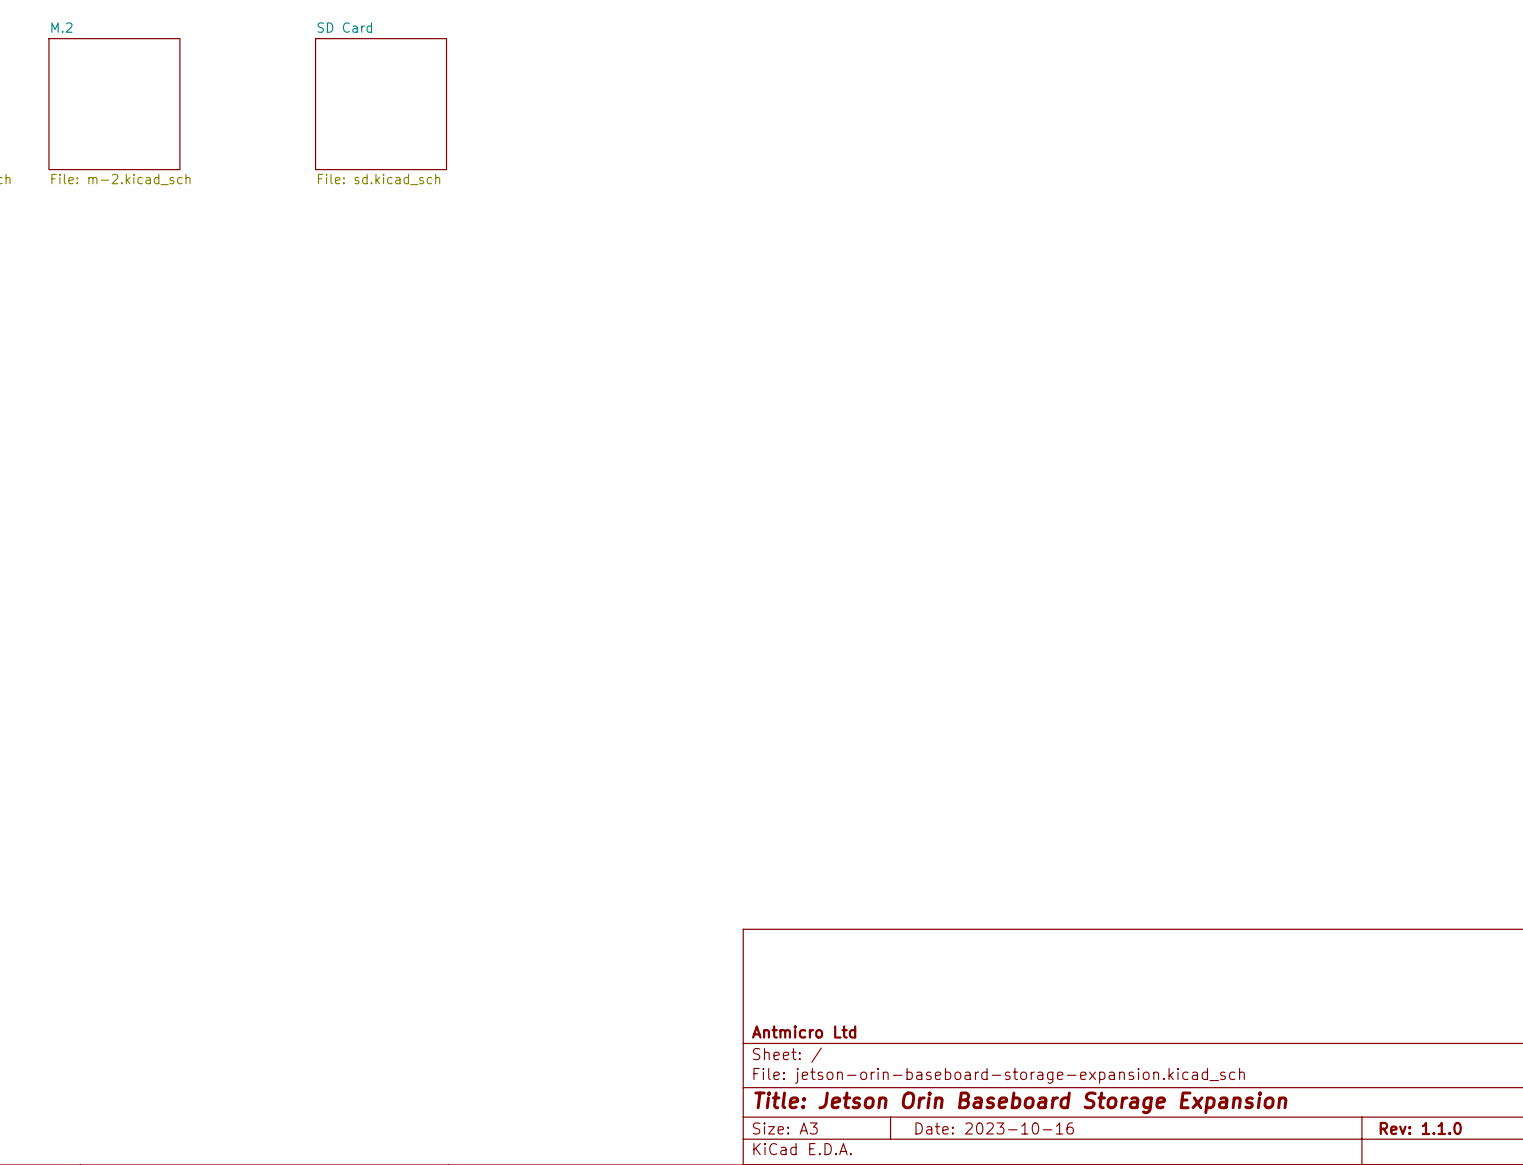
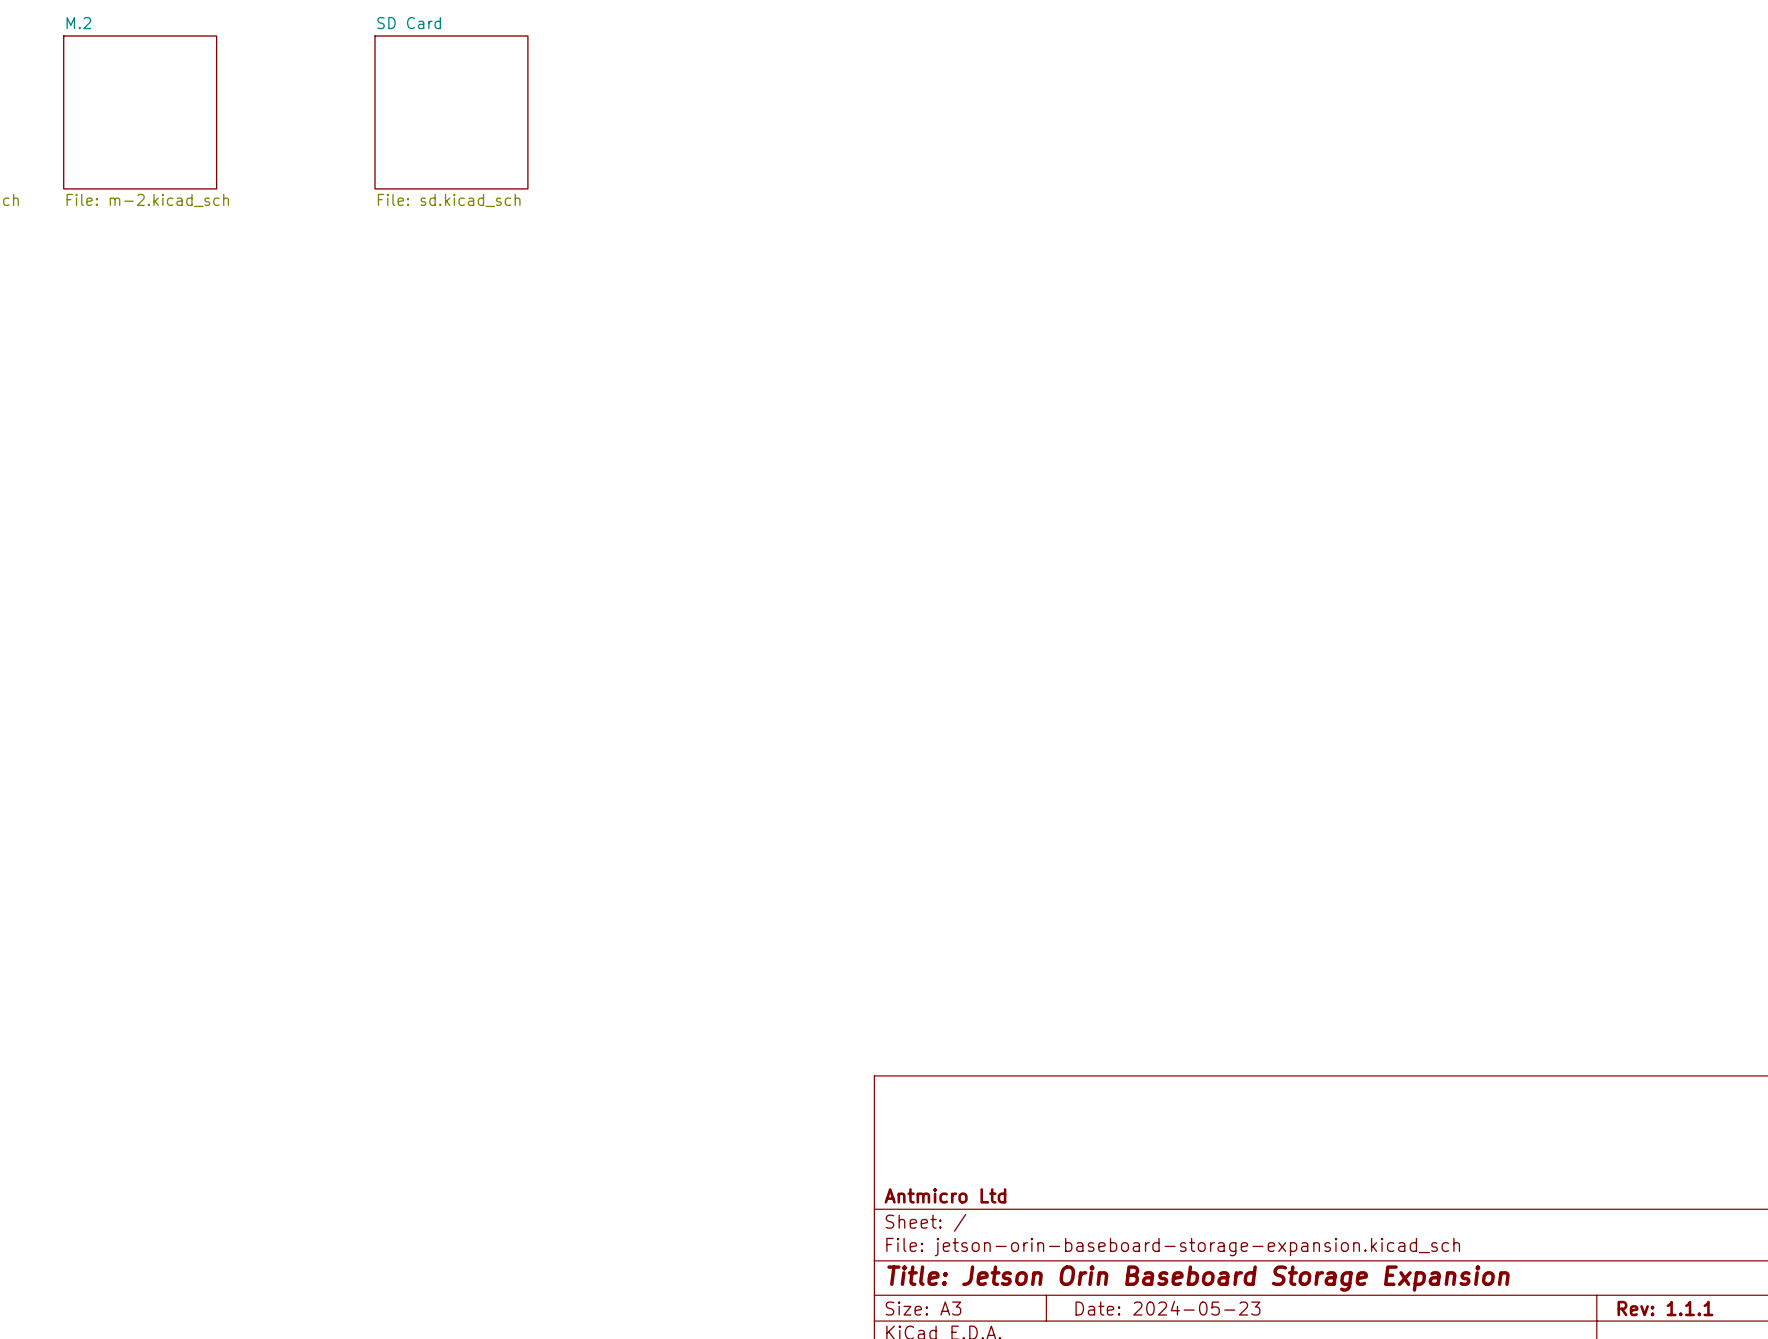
title block: Date: 2023-10-16 (994, 1128) -> Date: 2024-05-23 (1167, 1308)
title block: Rev: 1.1.0 (1420, 1128) -> Rev: 1.1.1 (1665, 1308)

